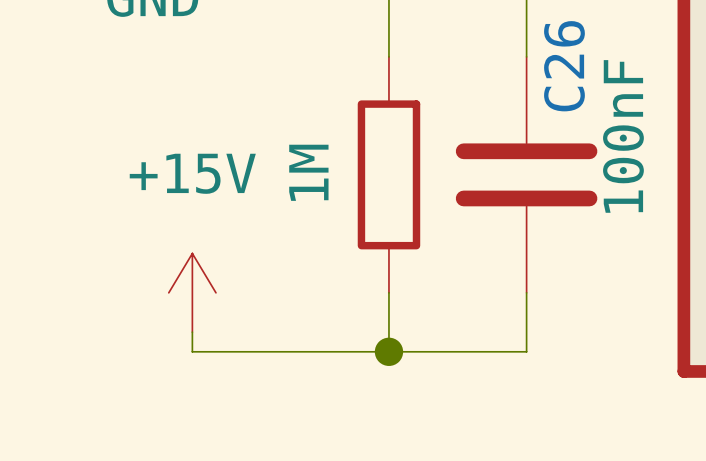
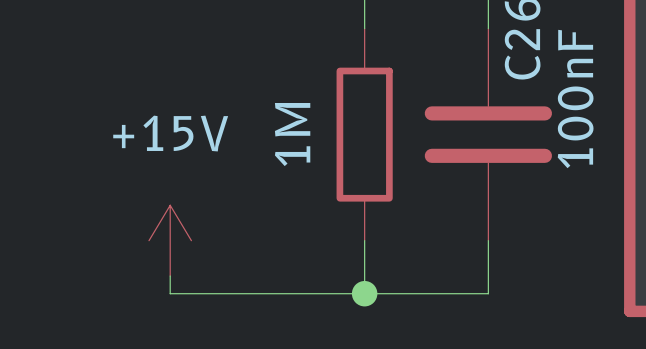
power symbol position: +15V (192, 292) -> +15V (170, 240)
wire: (192, 332) (192, 351) -> (170, 276) (170, 293) (187, 293)

